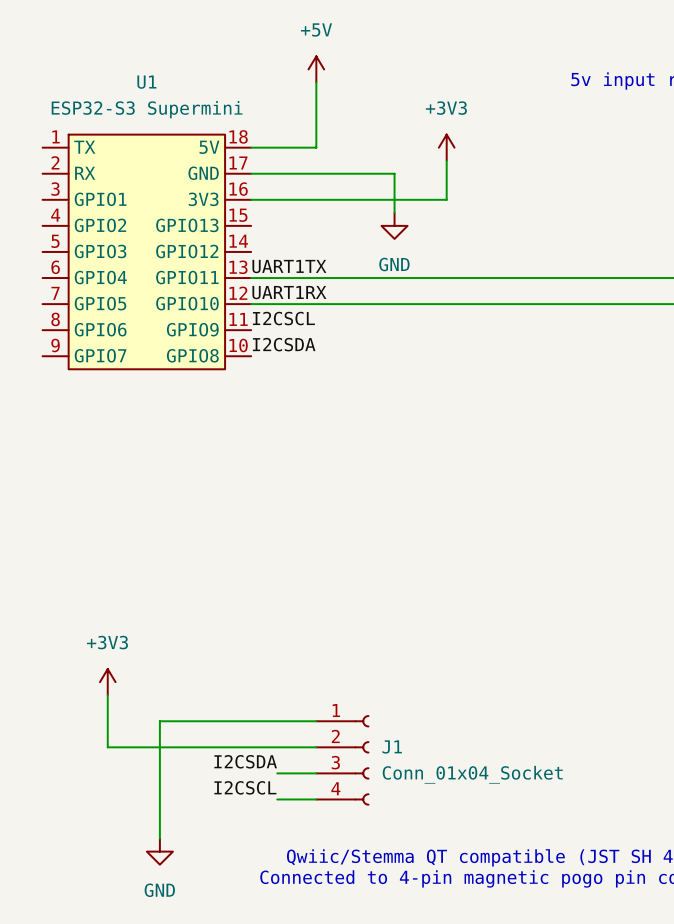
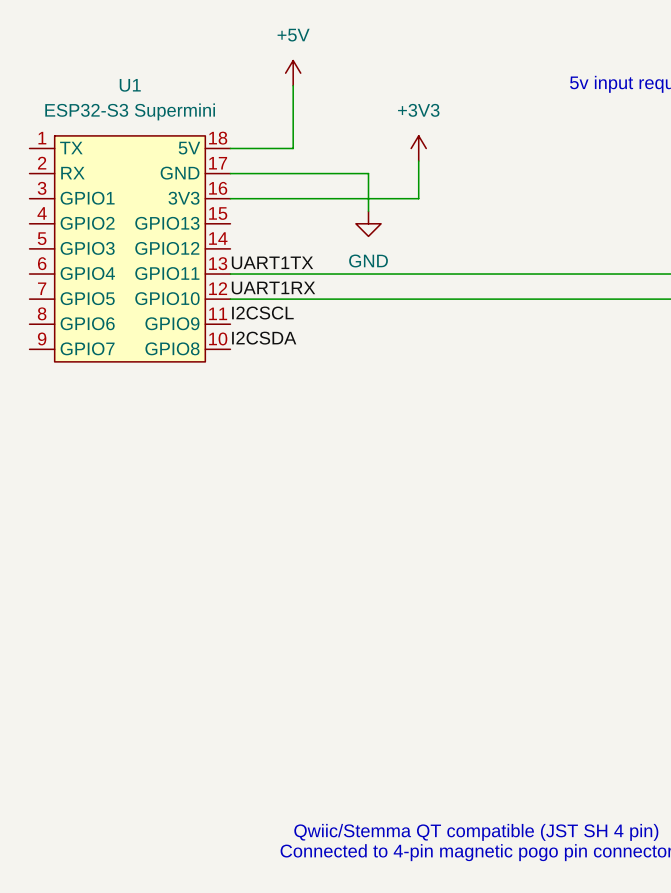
power symbol: +3V3 (107, 682) -> none
wire: (107, 695) (107, 747) (316, 747) -> none
wire: (316, 721) (159, 721) (159, 838) -> none
J1: Conn_01x04_Socket (342, 760) -> none
label: I2CSDA (245, 761) -> none
wire: (277, 773) (316, 773) -> none
label: I2CSCL (245, 787) -> none
wire: (277, 799) (316, 799) -> none
power symbol: GND (159, 851) -> none

